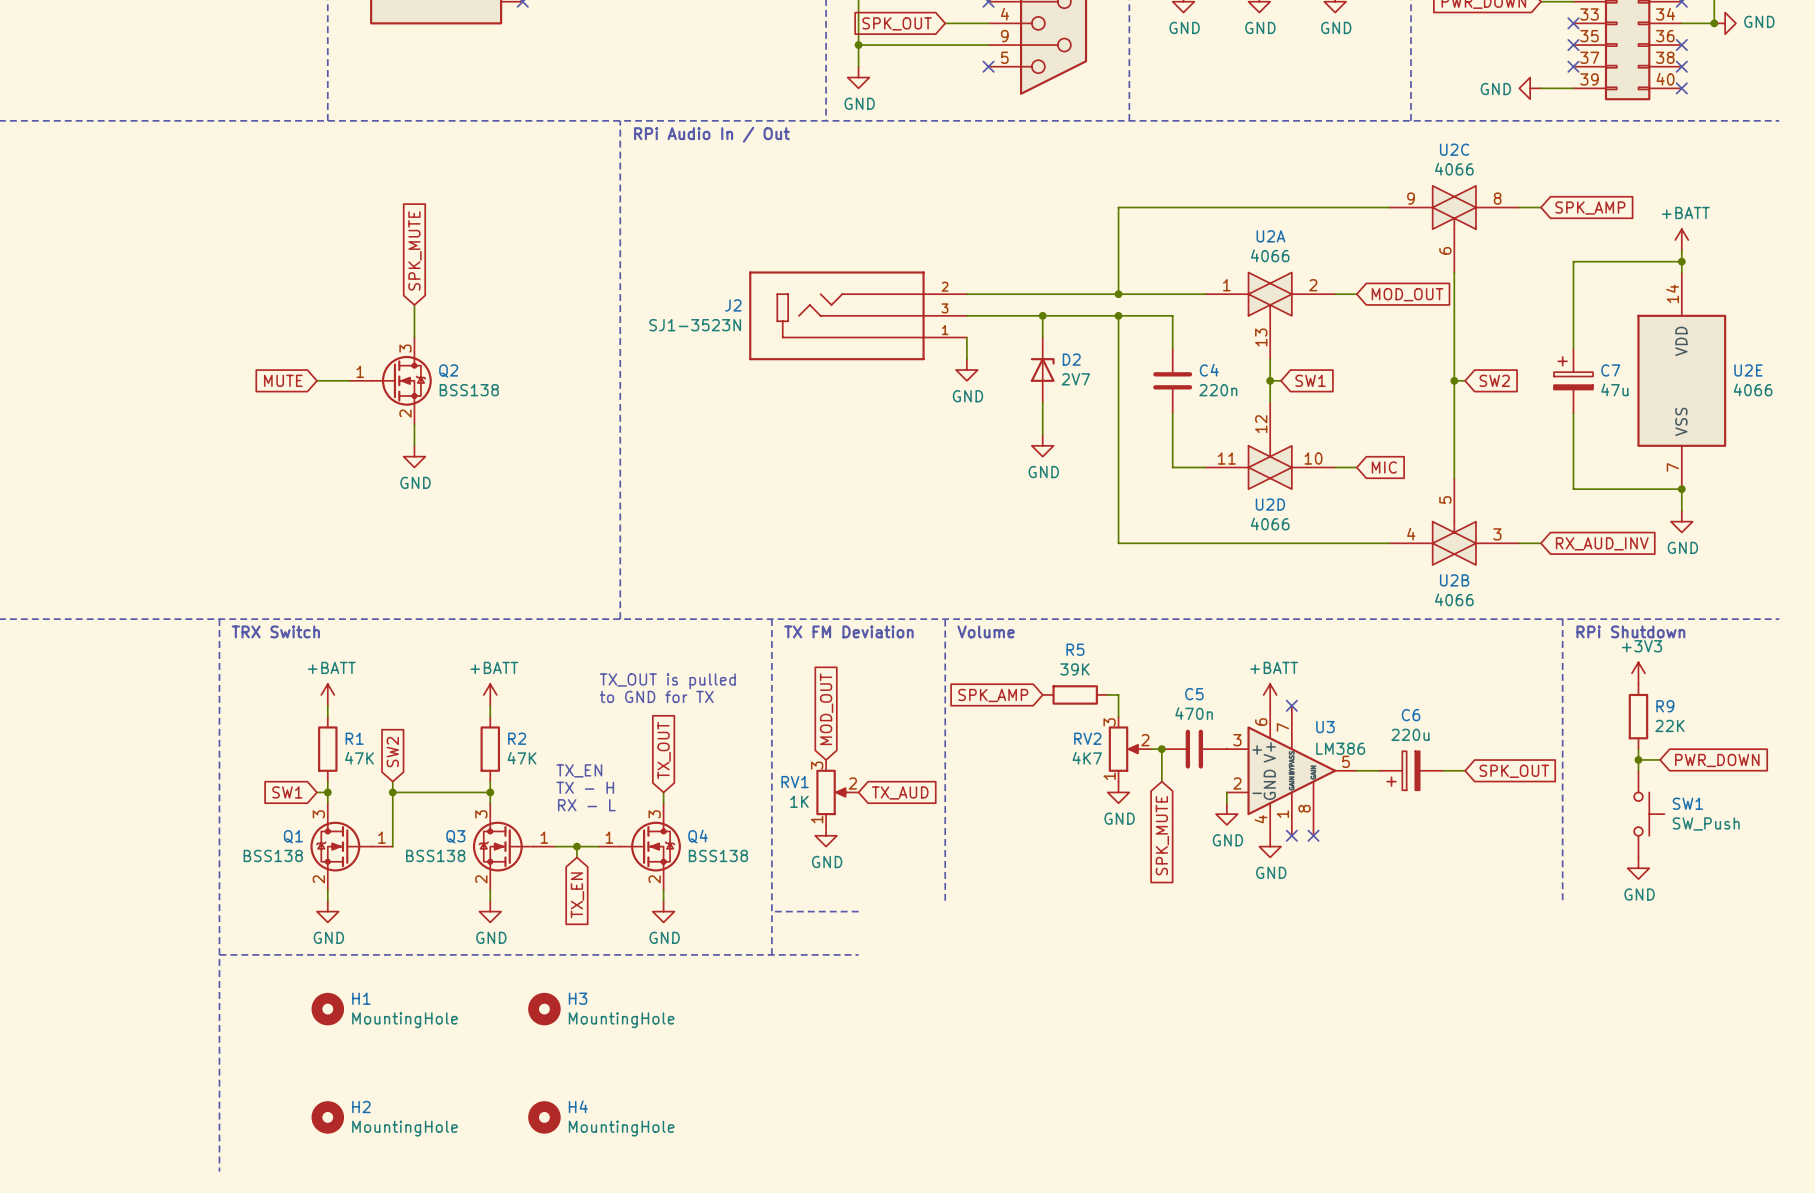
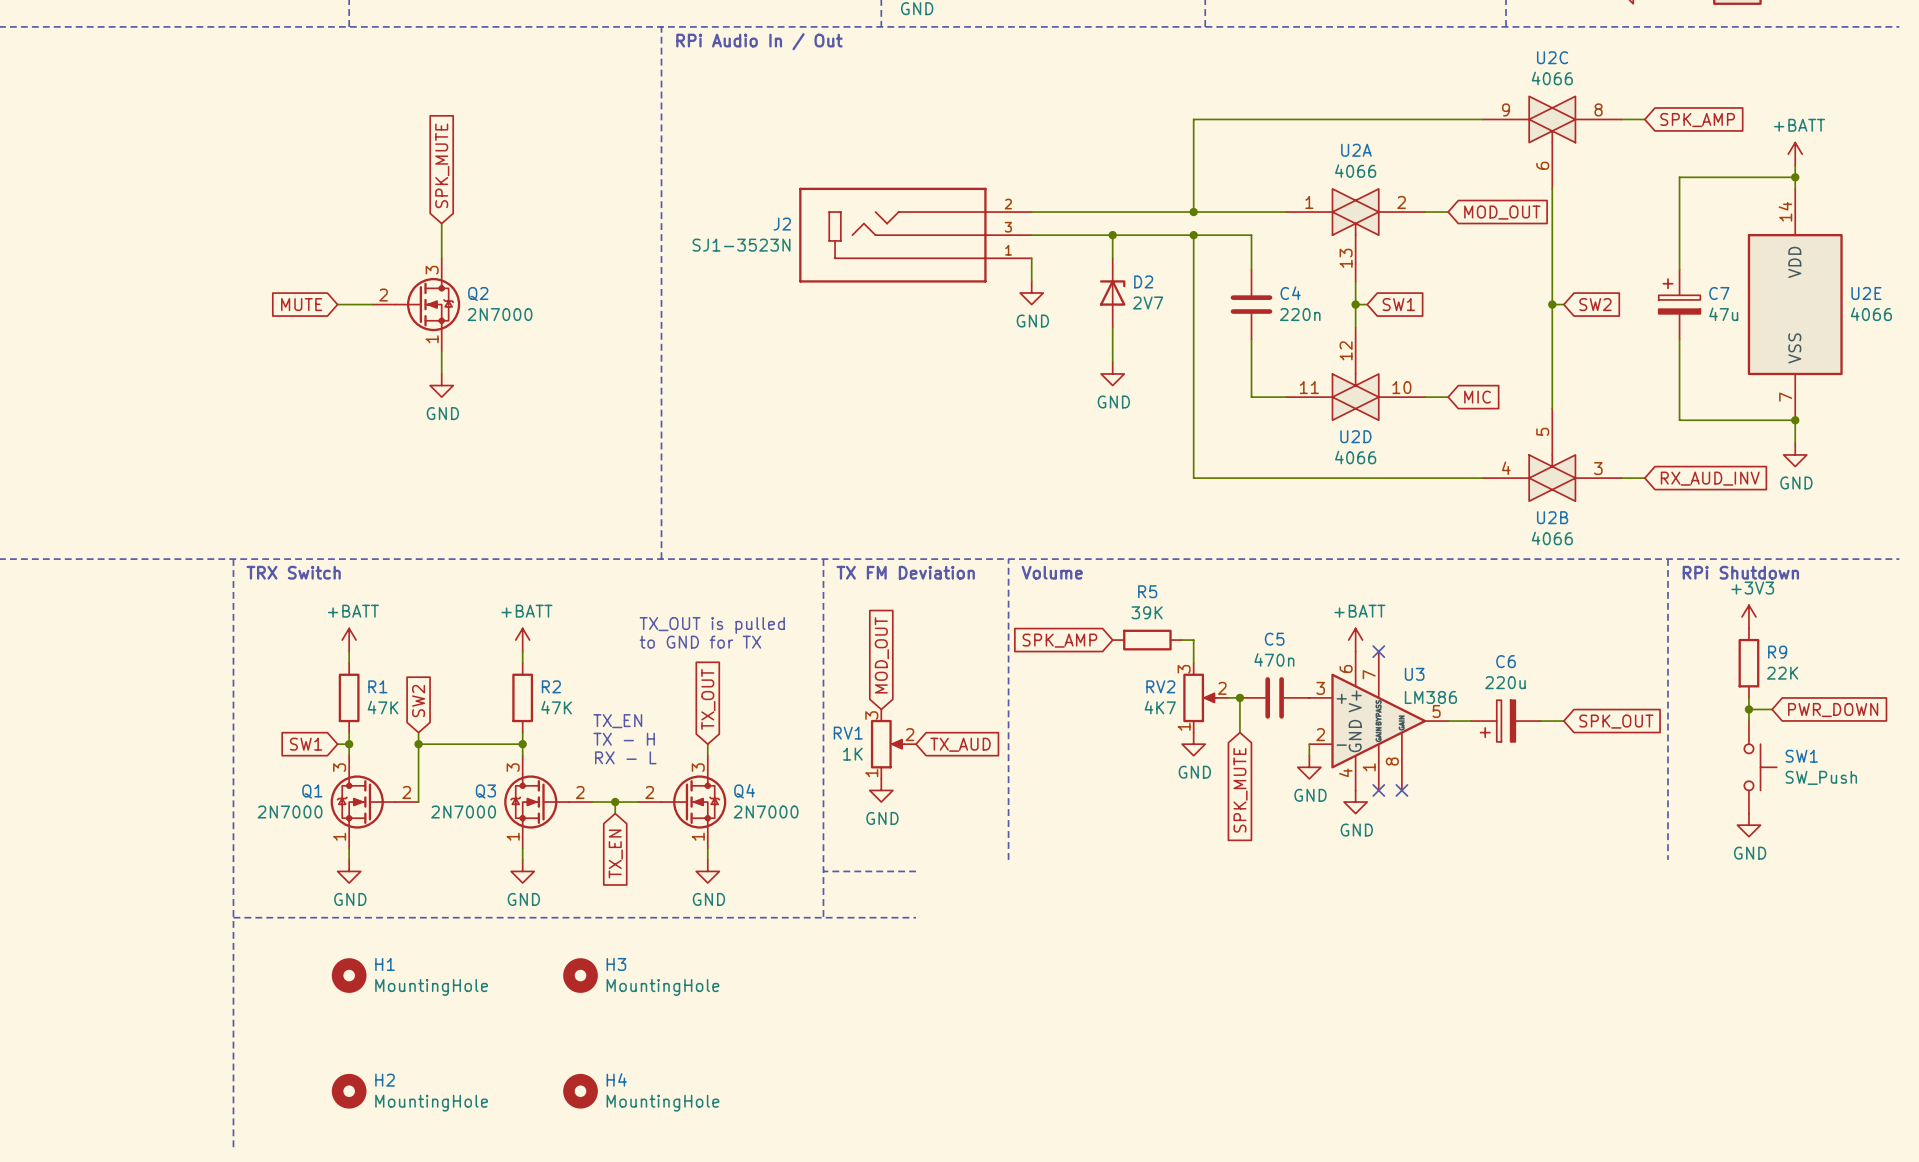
Q2 pin number: 1 (360, 371) -> 2 (383, 295)
Q2 value: BSS138 (469, 390) -> 2N7000 (500, 314)
Q2 pin number: 2 (405, 413) -> 1 (432, 339)
Q1 pin number: 1 (381, 837) -> 2 (406, 792)
Q3 pin number: 1 (544, 837) -> 2 (580, 792)
Q4 pin number: 1 (609, 837) -> 2 (649, 792)
Q1 value: BSS138 (273, 855) -> 2N7000 (290, 812)
Q3 value: BSS138 (435, 855) -> 2N7000 (463, 812)
Q4 value: BSS138 (718, 855) -> 2N7000 (766, 812)
Q1 pin number: 2 (318, 879) -> 1 (339, 836)
Q3 pin number: 2 (481, 879) -> 1 (513, 836)
Q4 pin number: 2 (654, 879) -> 1 (698, 836)

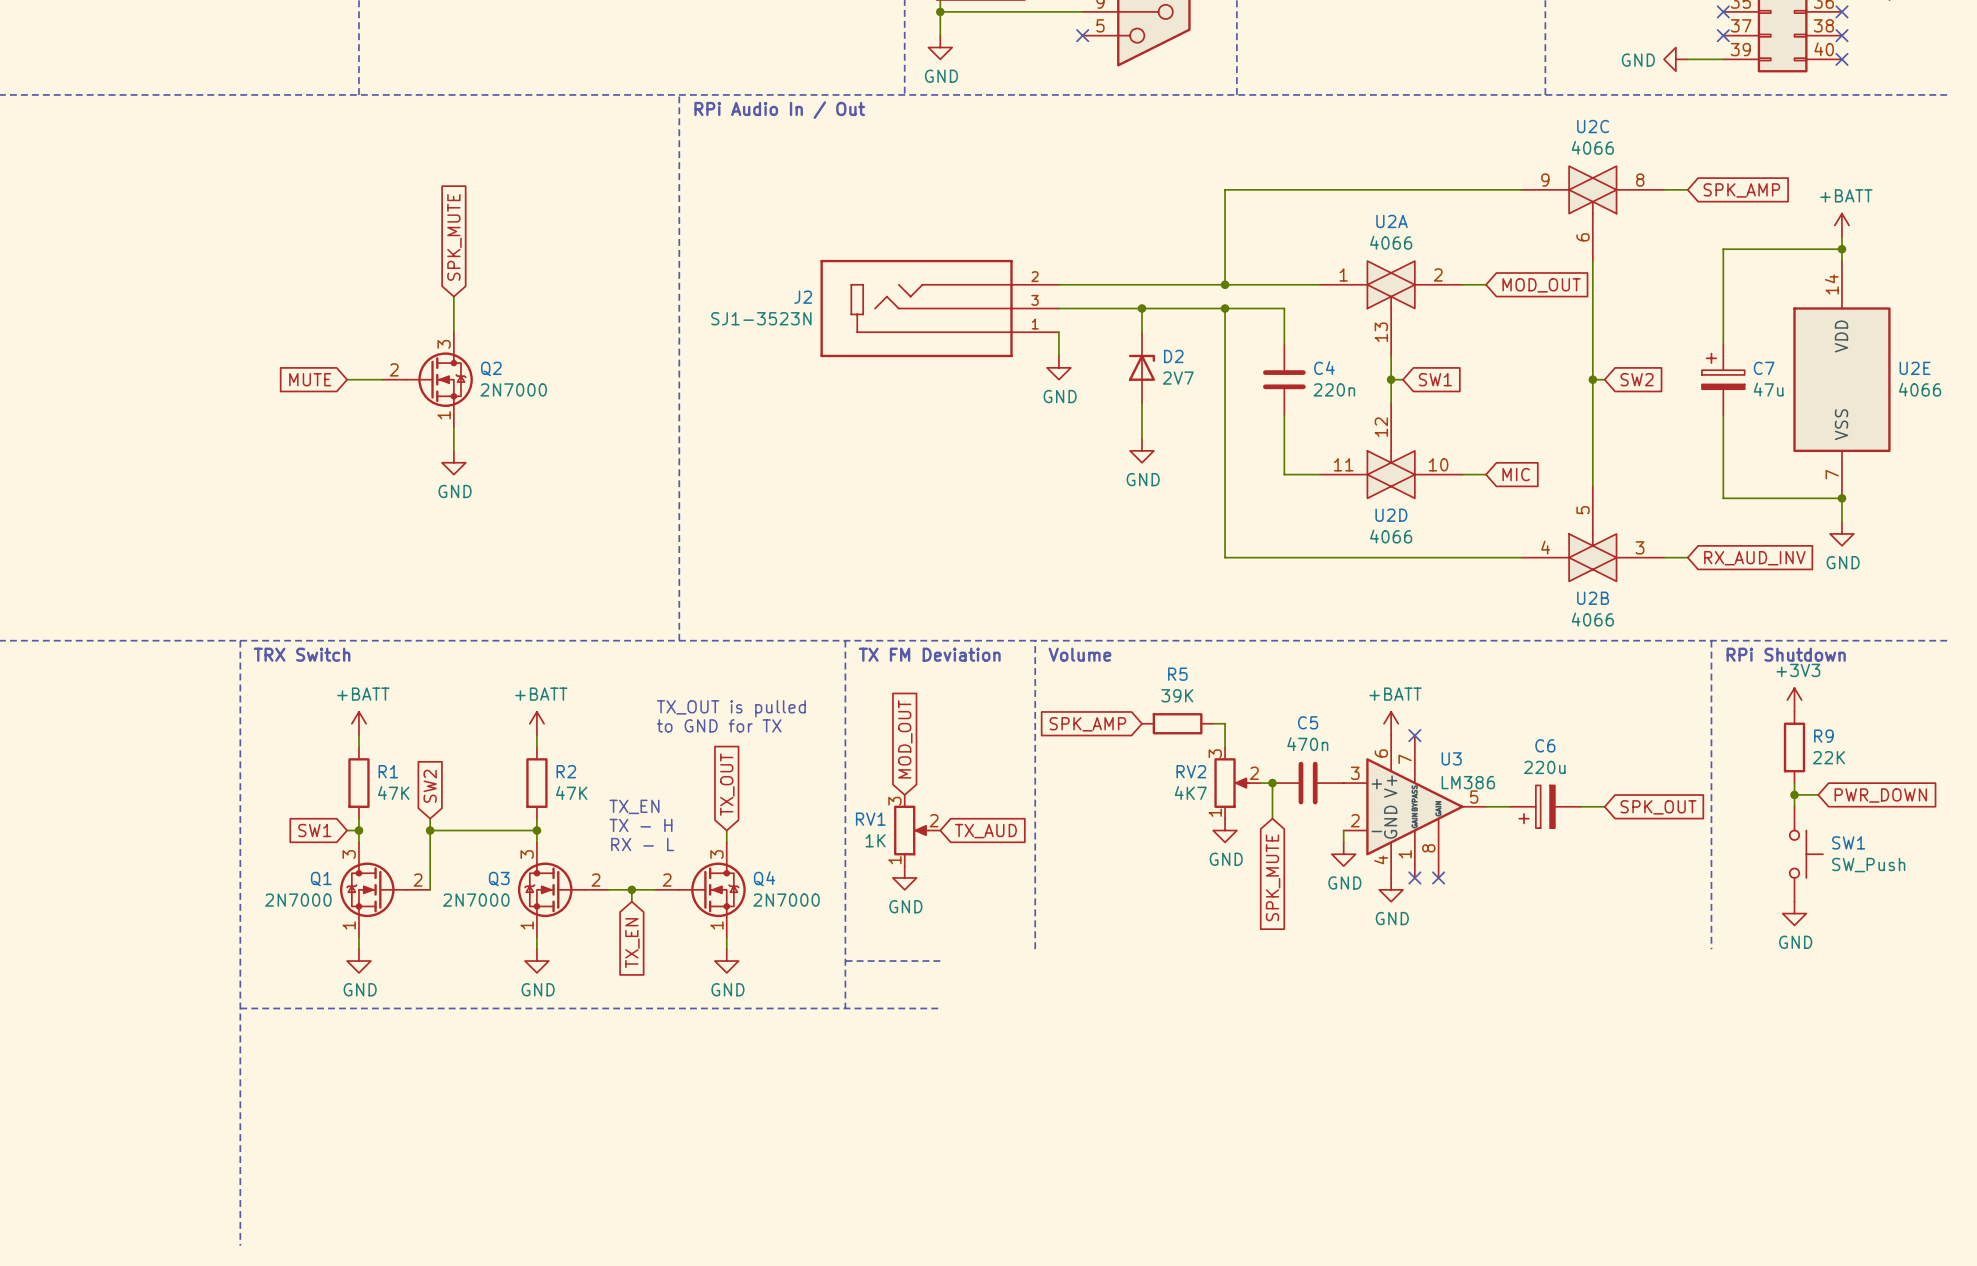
H1: MountingHole (349, 975) -> none
H3: MountingHole (580, 975) -> none
H2: MountingHole (349, 1091) -> none
H4: MountingHole (580, 1091) -> none

